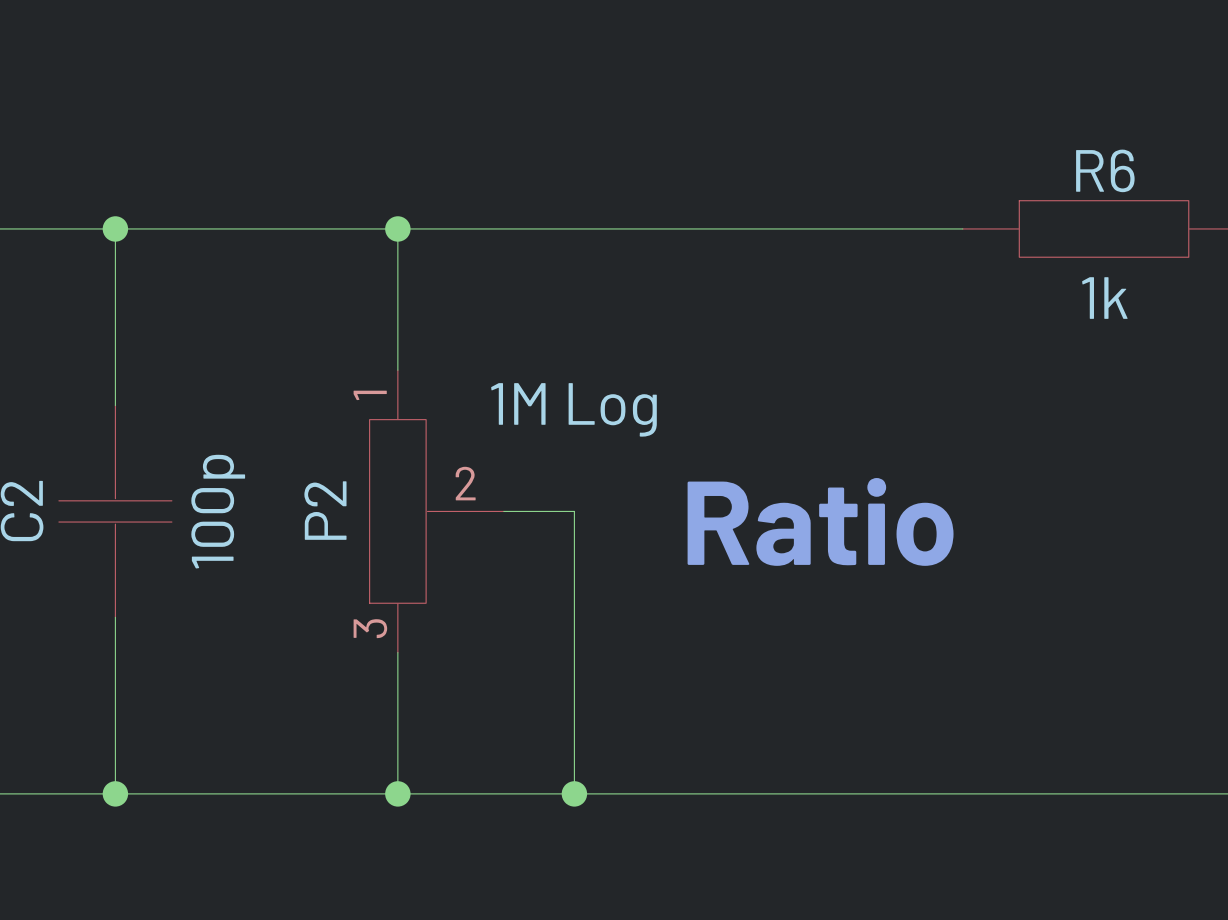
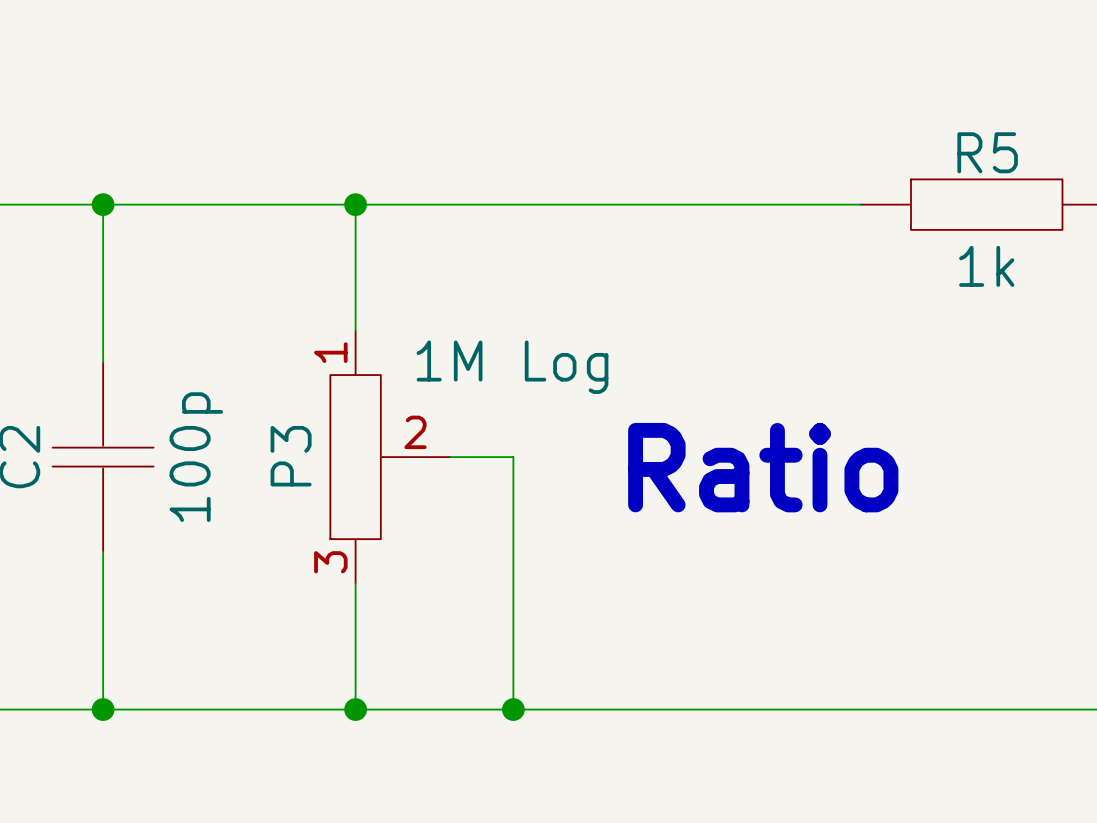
R6 name: R6 (1105, 170) -> R5 (987, 152)
P2 name: P2 (325, 510) -> P3 (291, 456)

